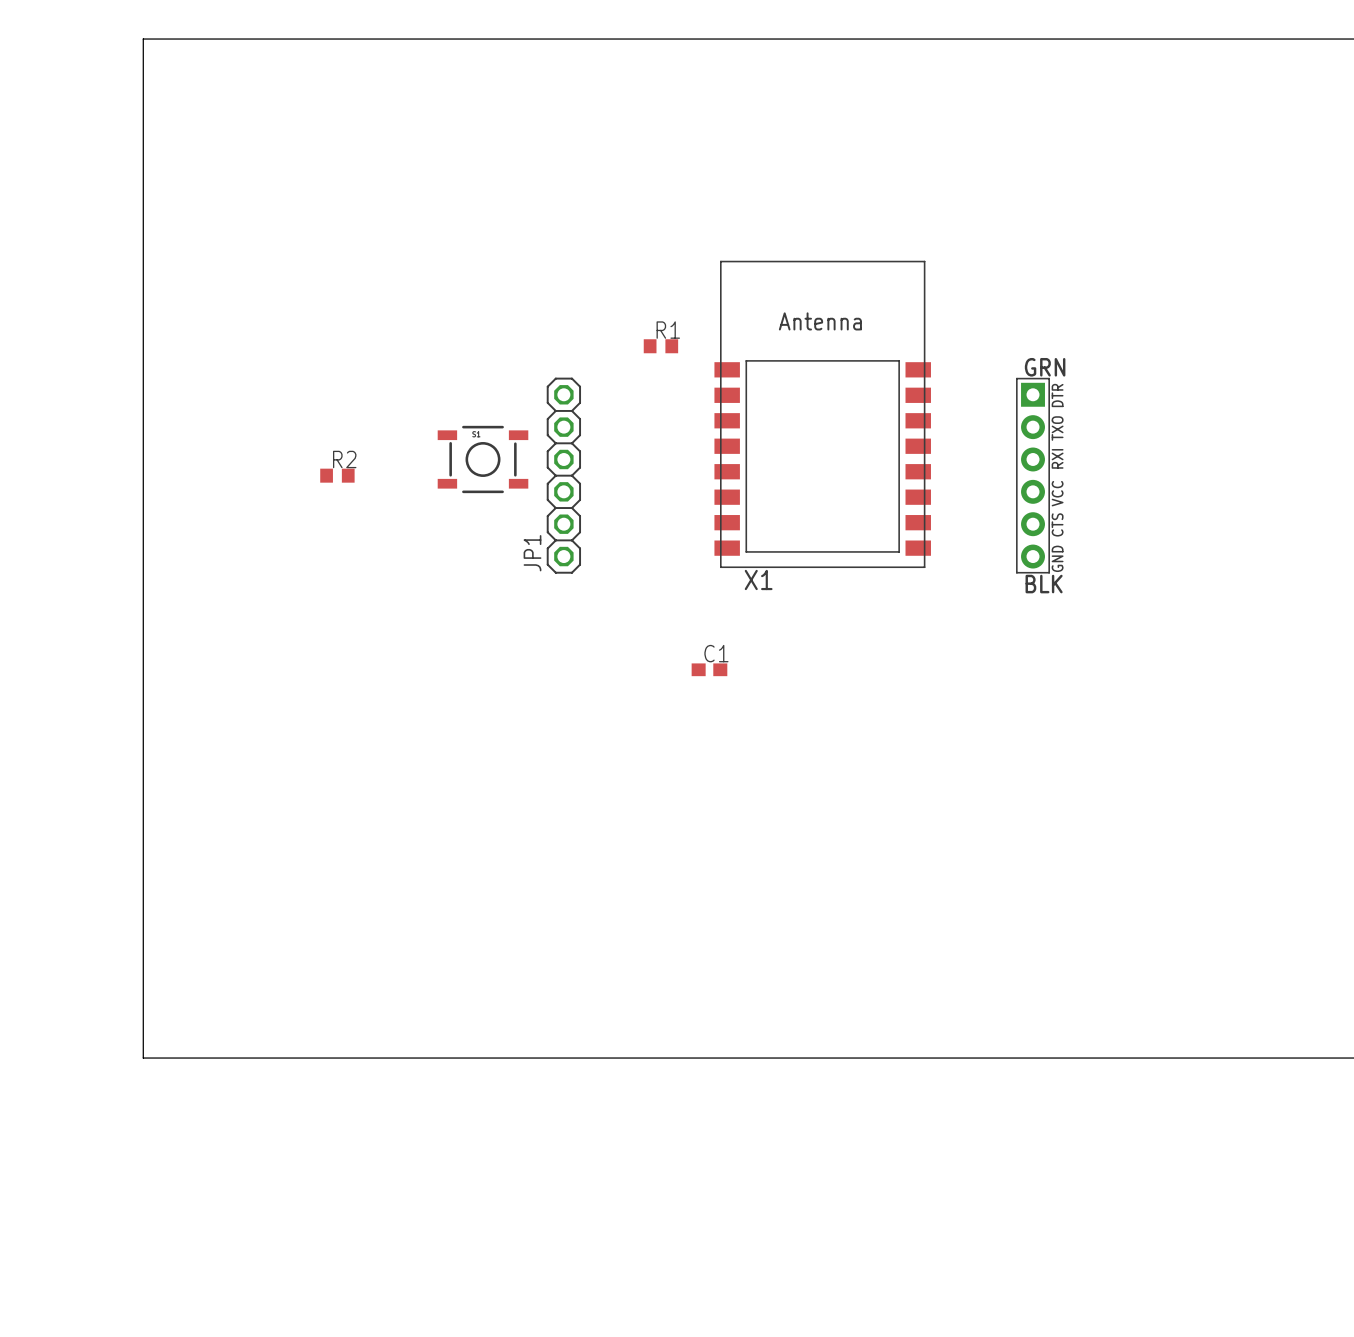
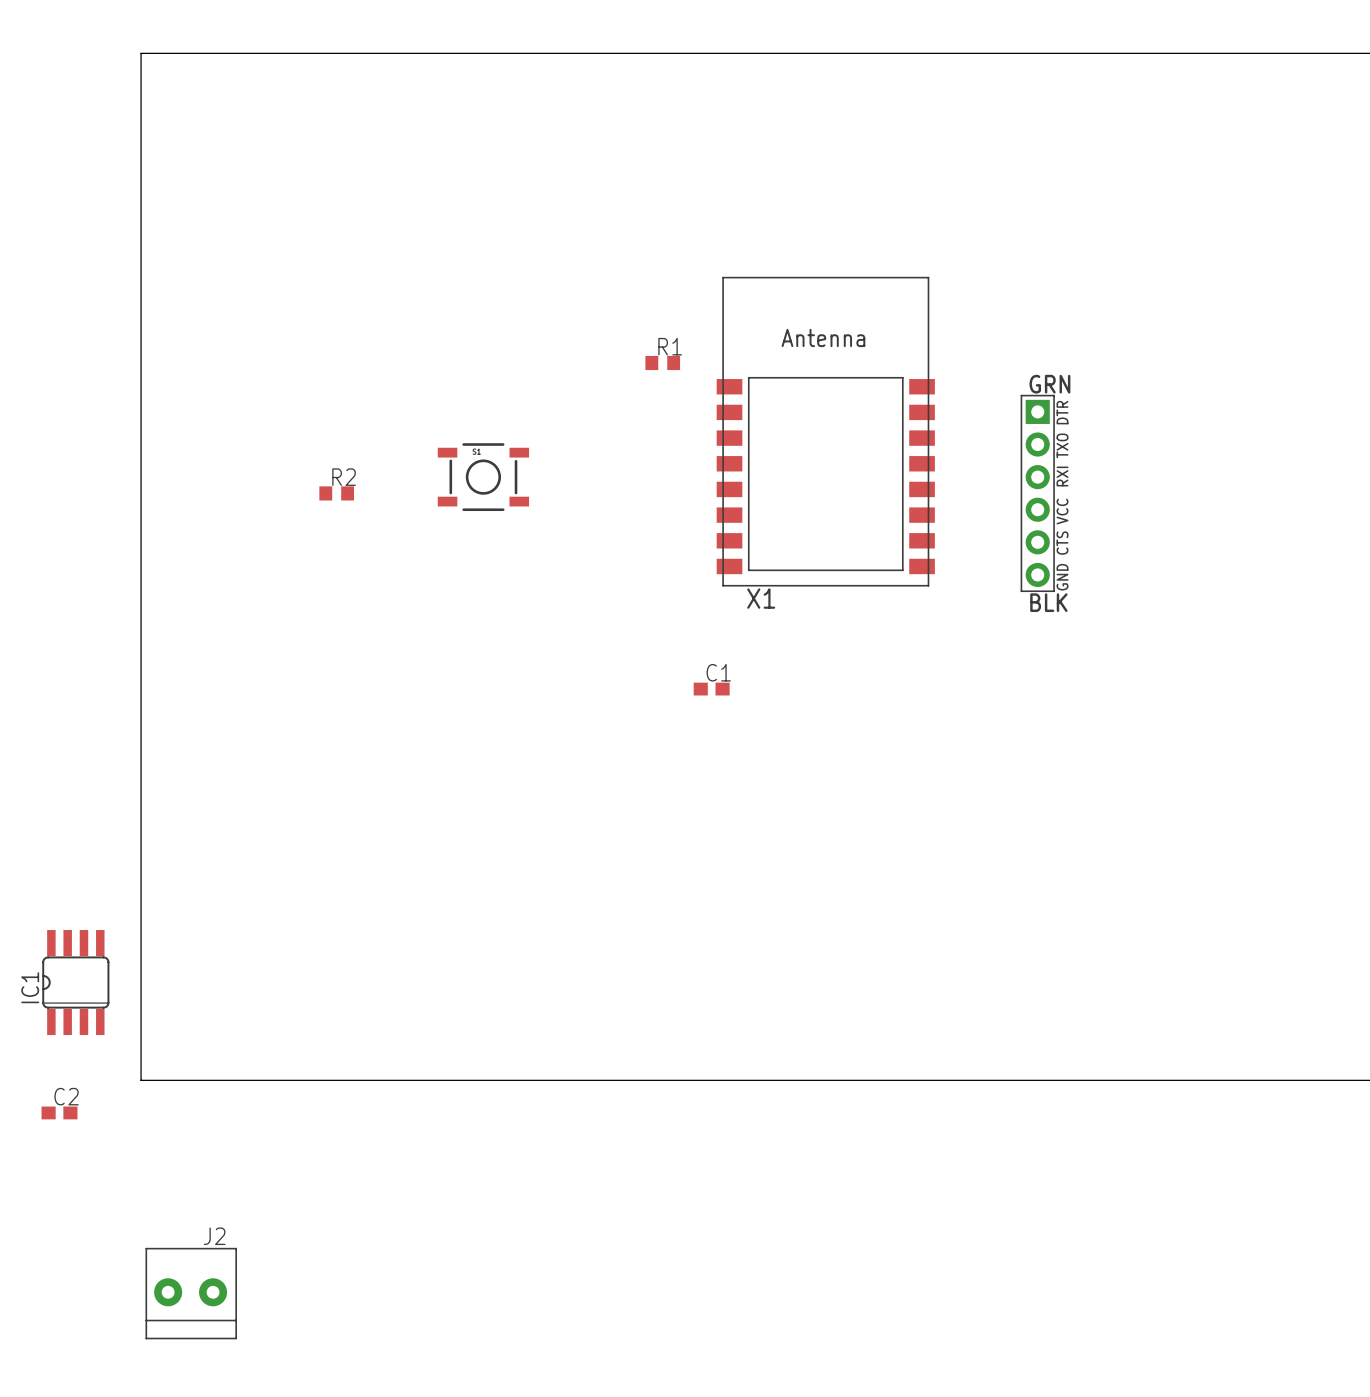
JP1: (563, 475) -> none
IC1: none -> (75, 982)
C2: none -> (59, 1112)
J2: none -> (191, 1293)

